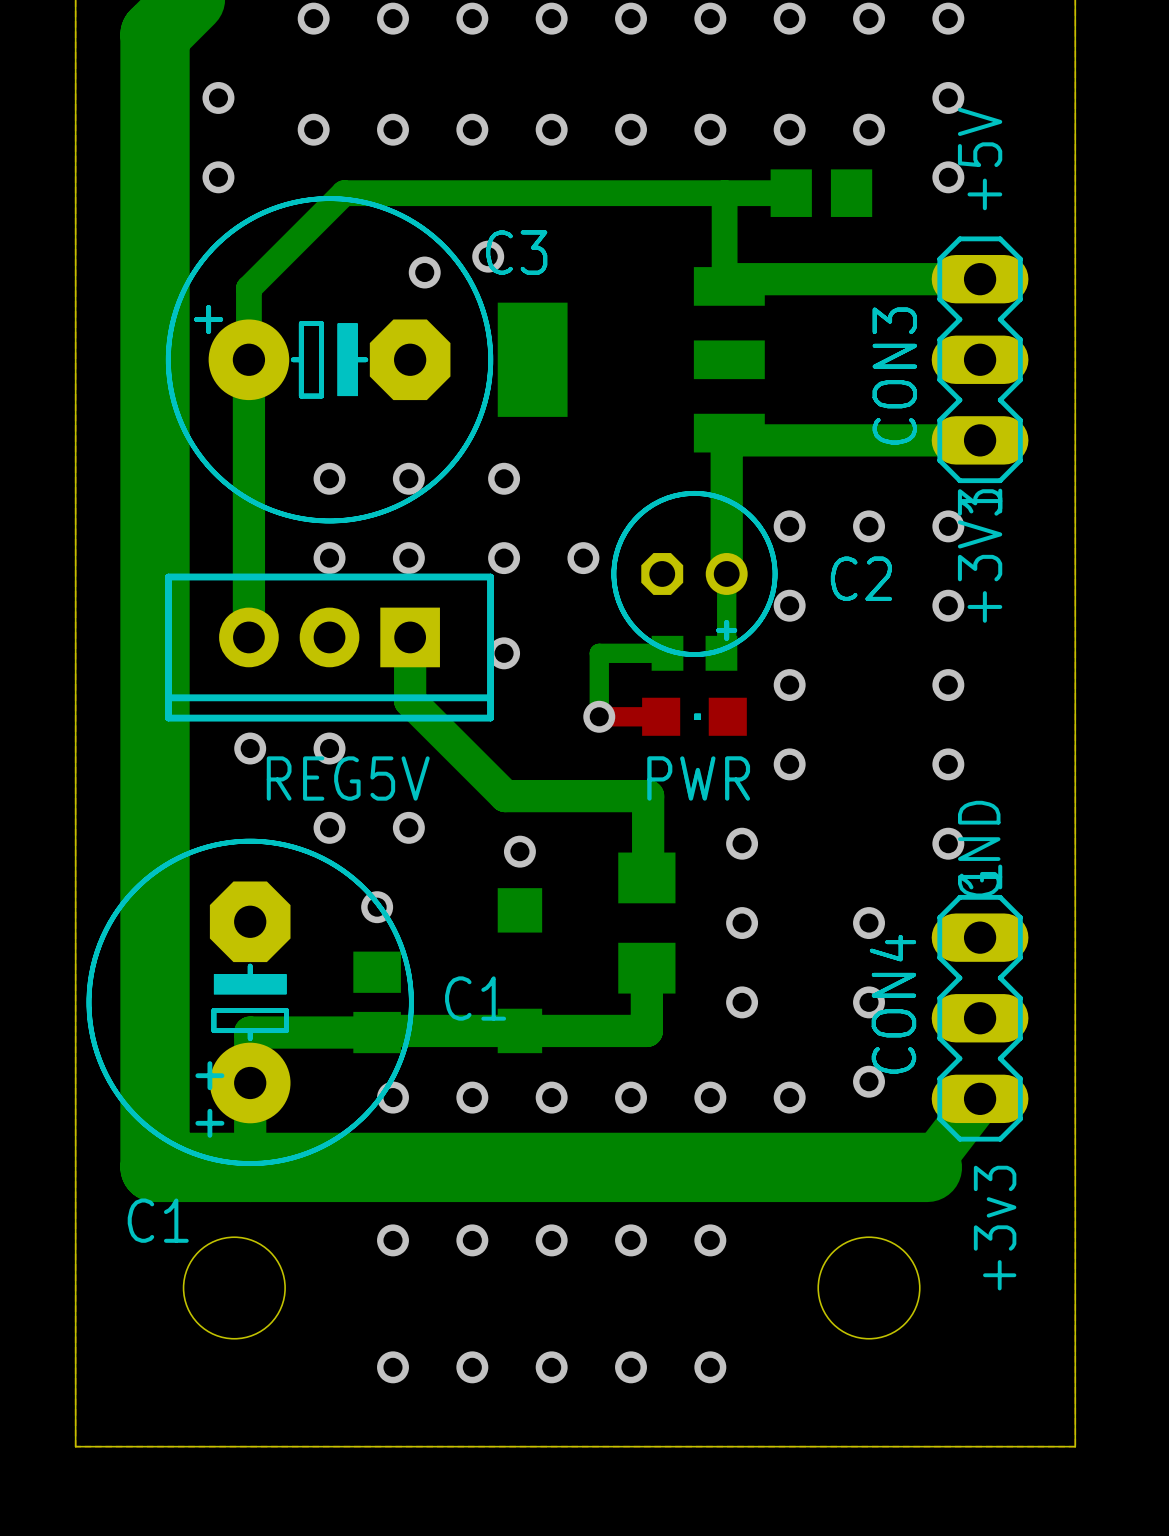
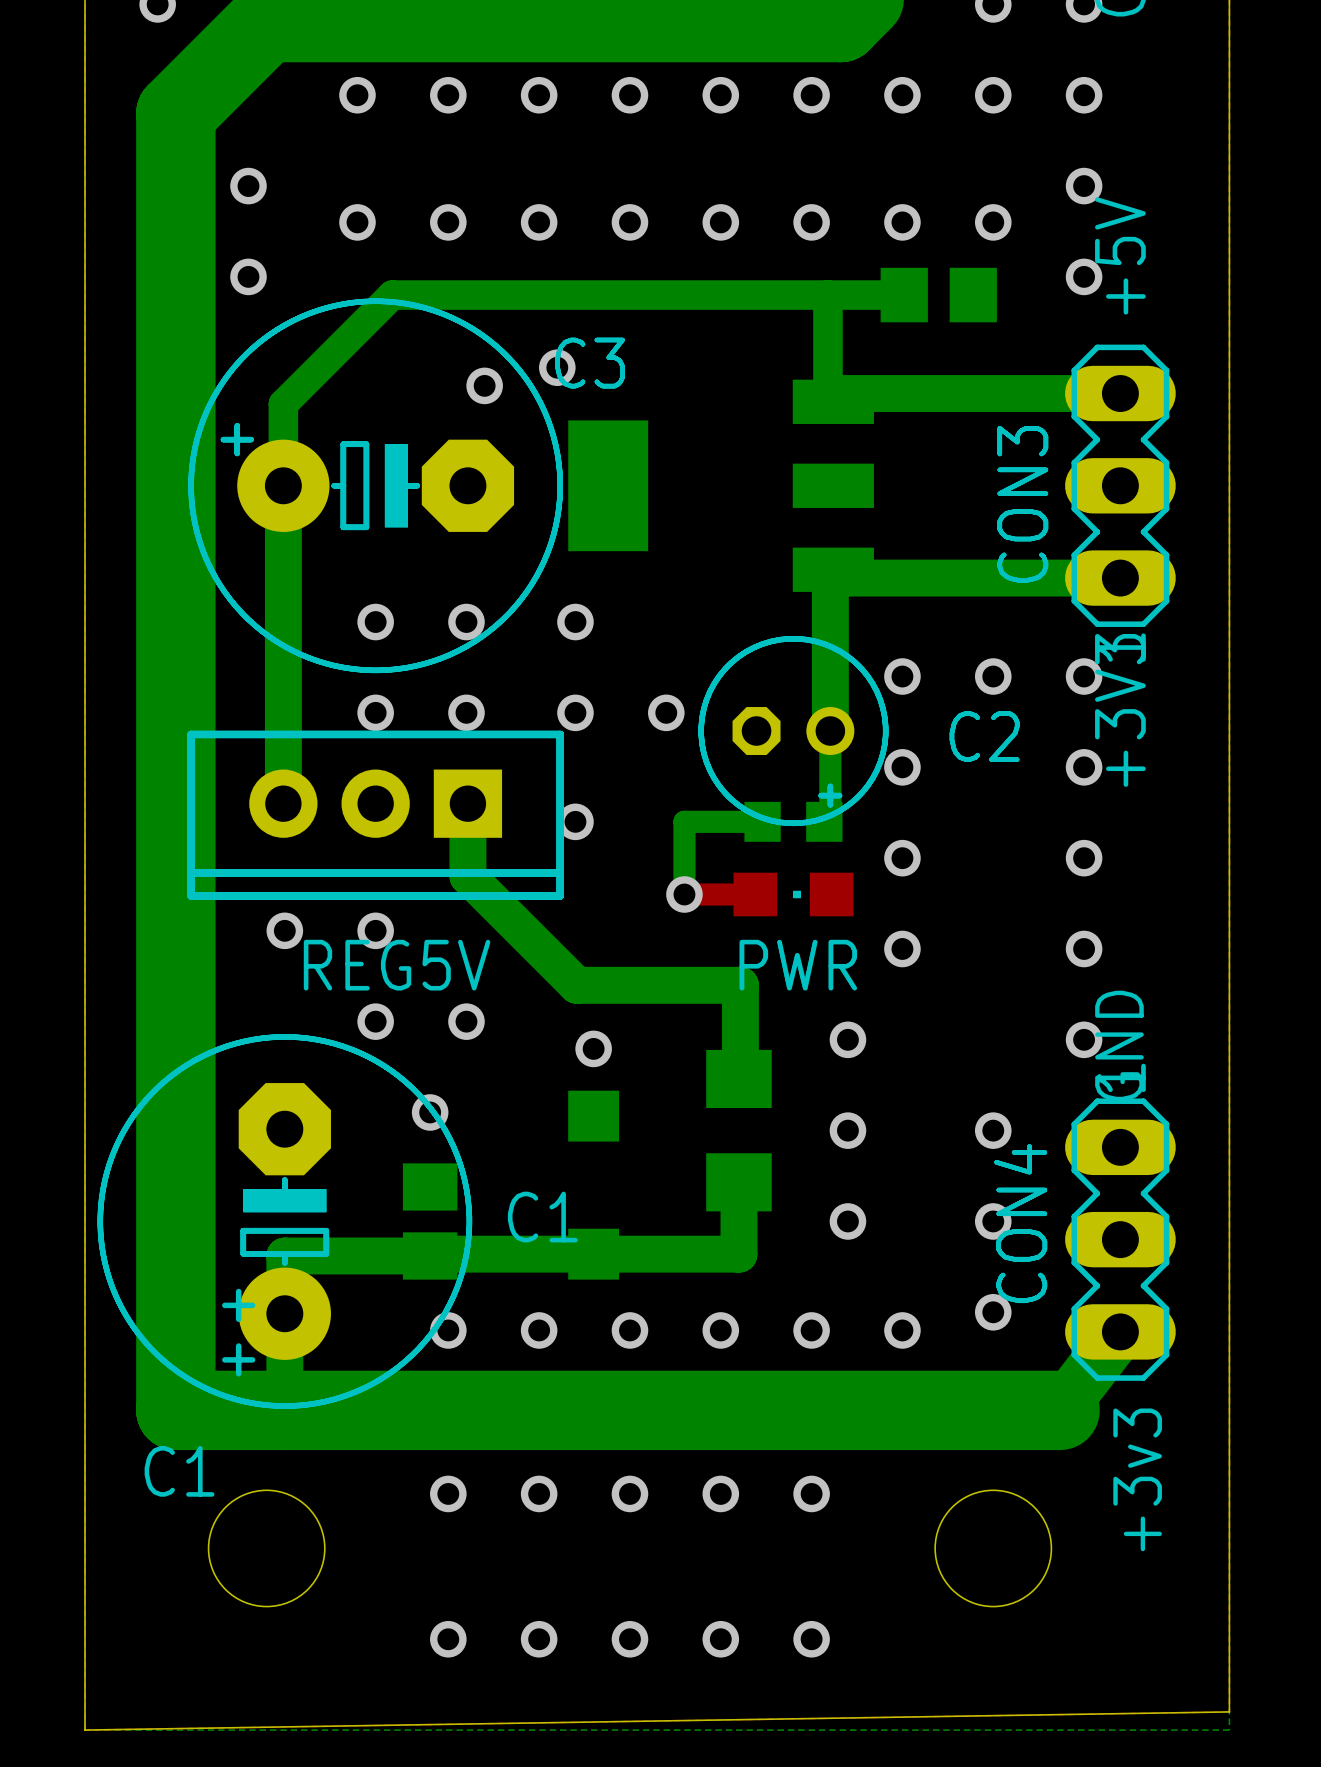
board edge: (1075, 1430) (1075, 1446) (75, 1446) -> (1229, 1711) (85, 1730)

